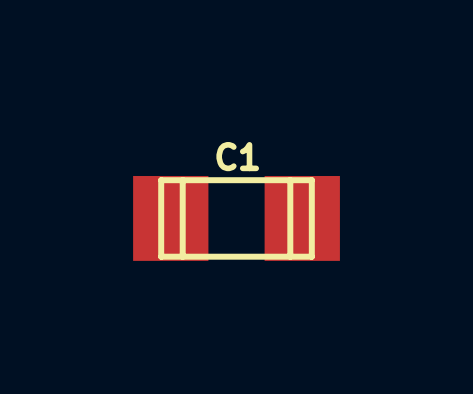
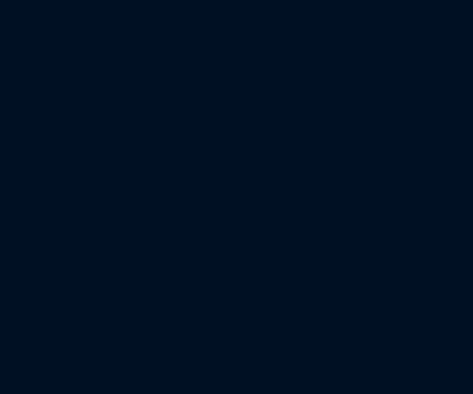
C1: (236, 218) -> none

